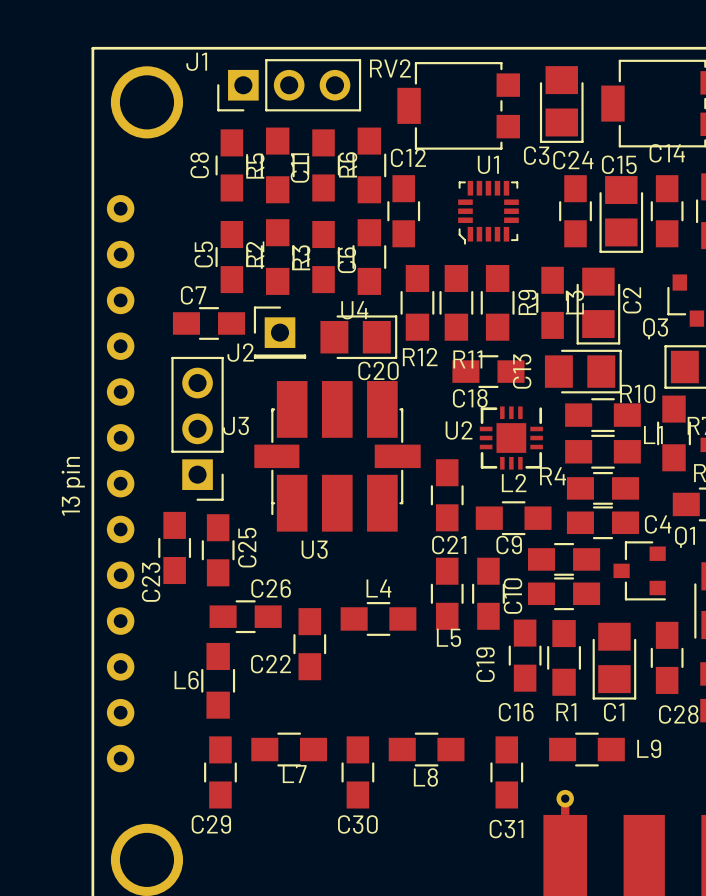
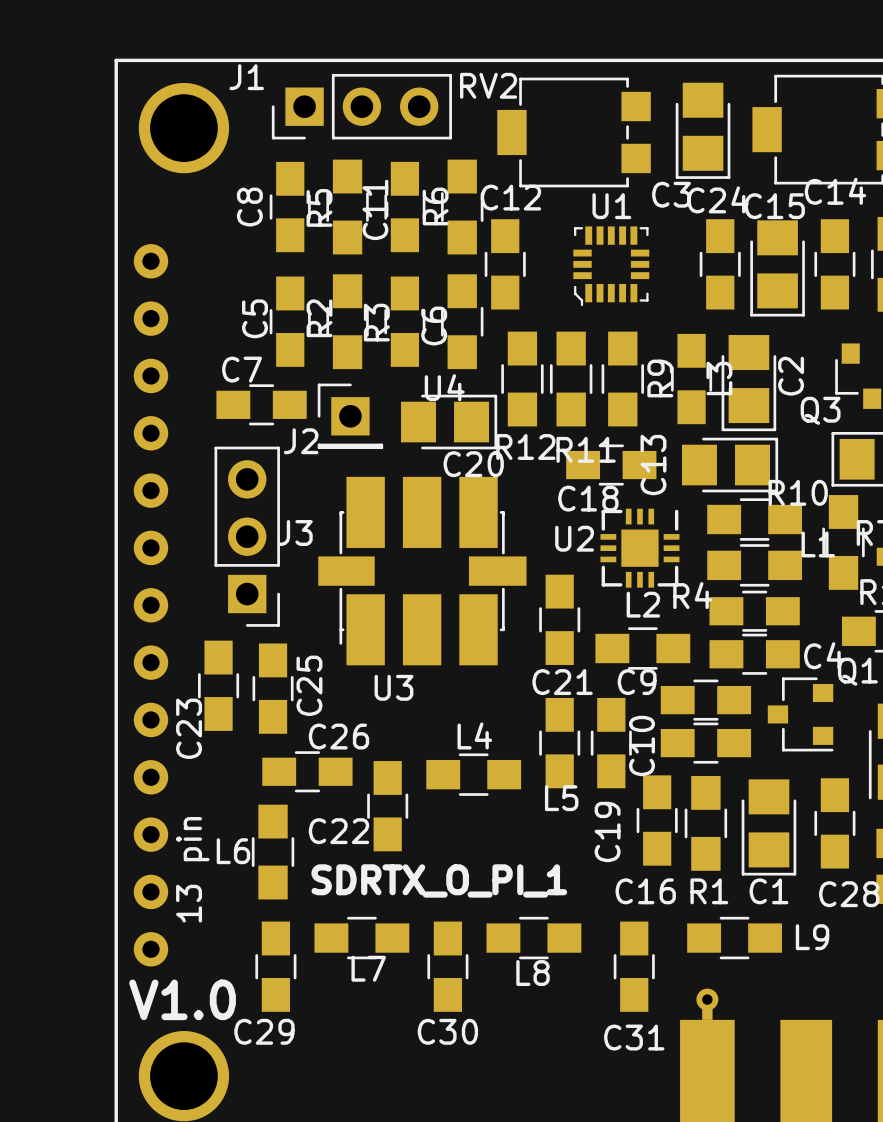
U4 text position: 13 pin (73, 486) -> 13 pin (192, 869)
text: none -> SDRTX_O_PI_1 (439, 880)
text: none -> V1.0 (182, 999)

